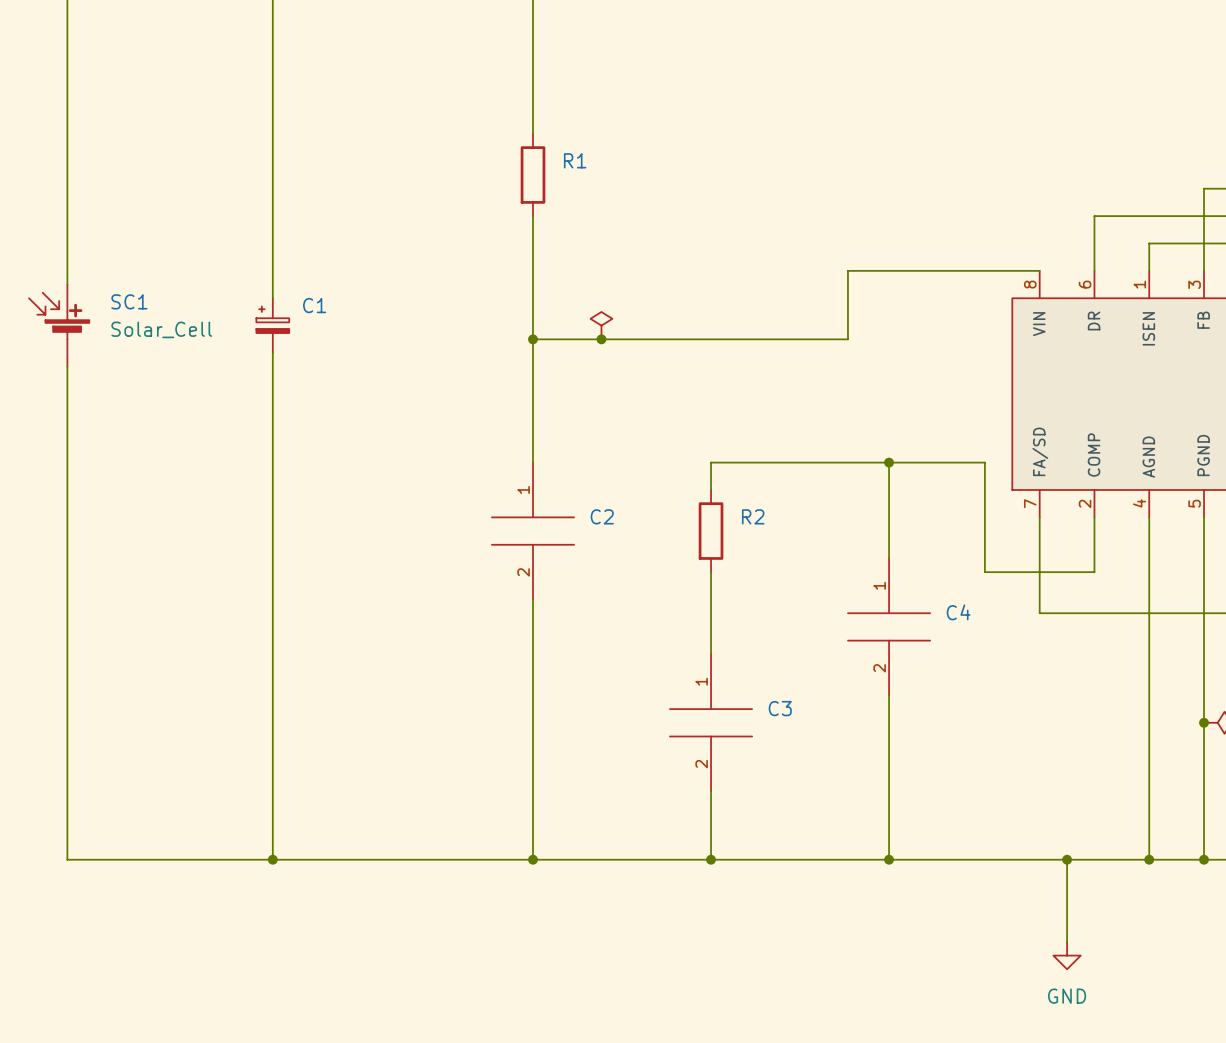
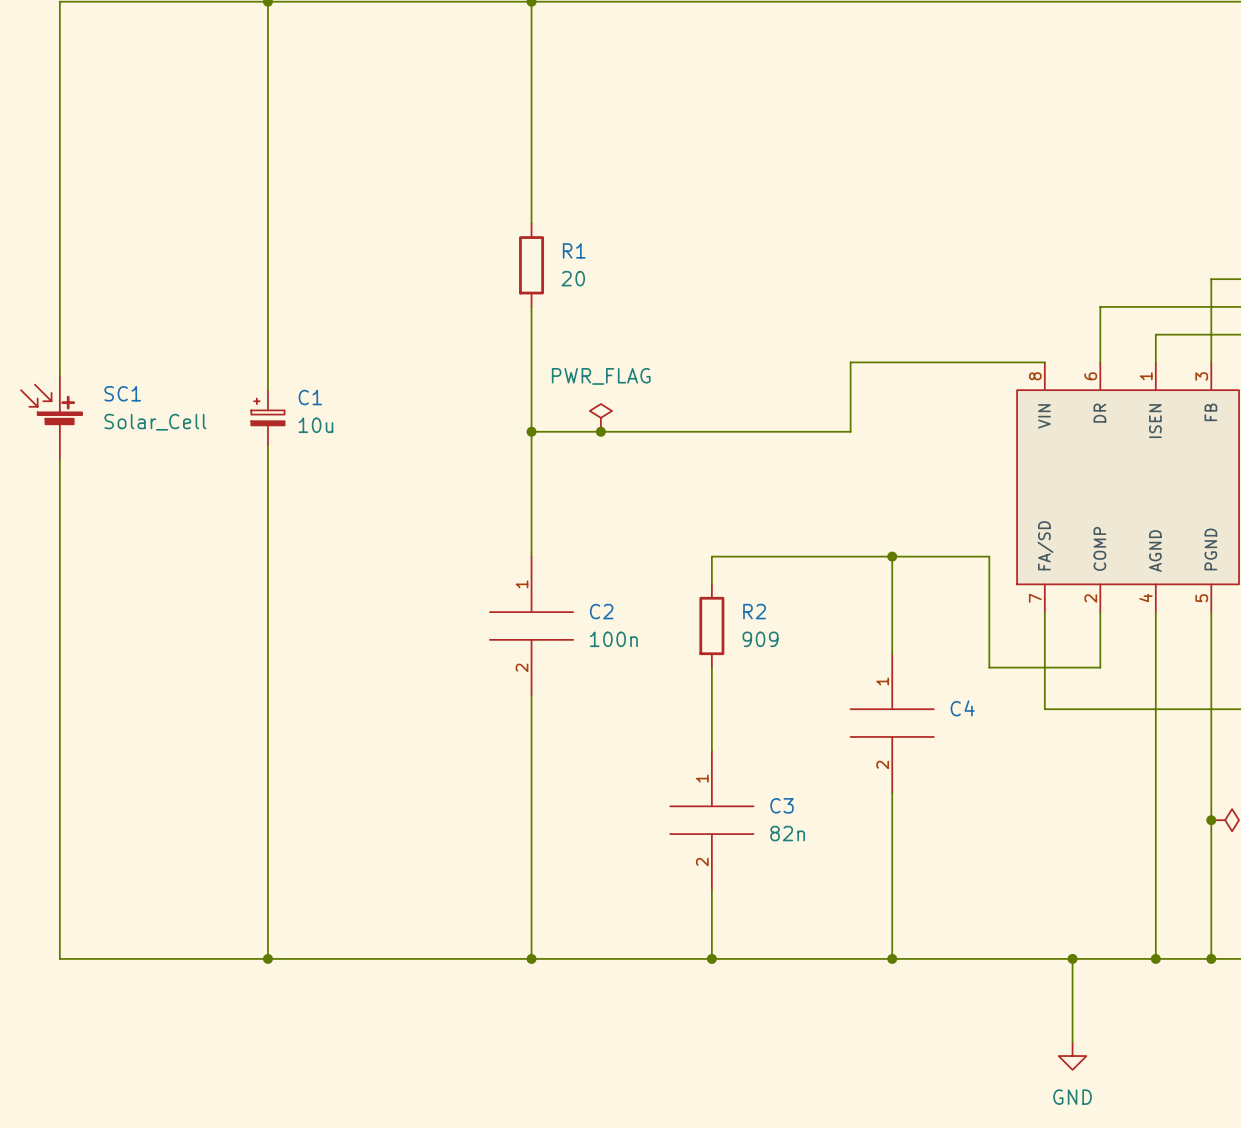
R1 value: none -> 20 (573, 278)
power symbol text: none -> PWR_FLAG (601, 376)
C1 value: none -> 10u (315, 425)
C2 value: none -> 100n (613, 639)
R2 value: none -> 909 (760, 639)
C3 value: none -> 82n (787, 833)

